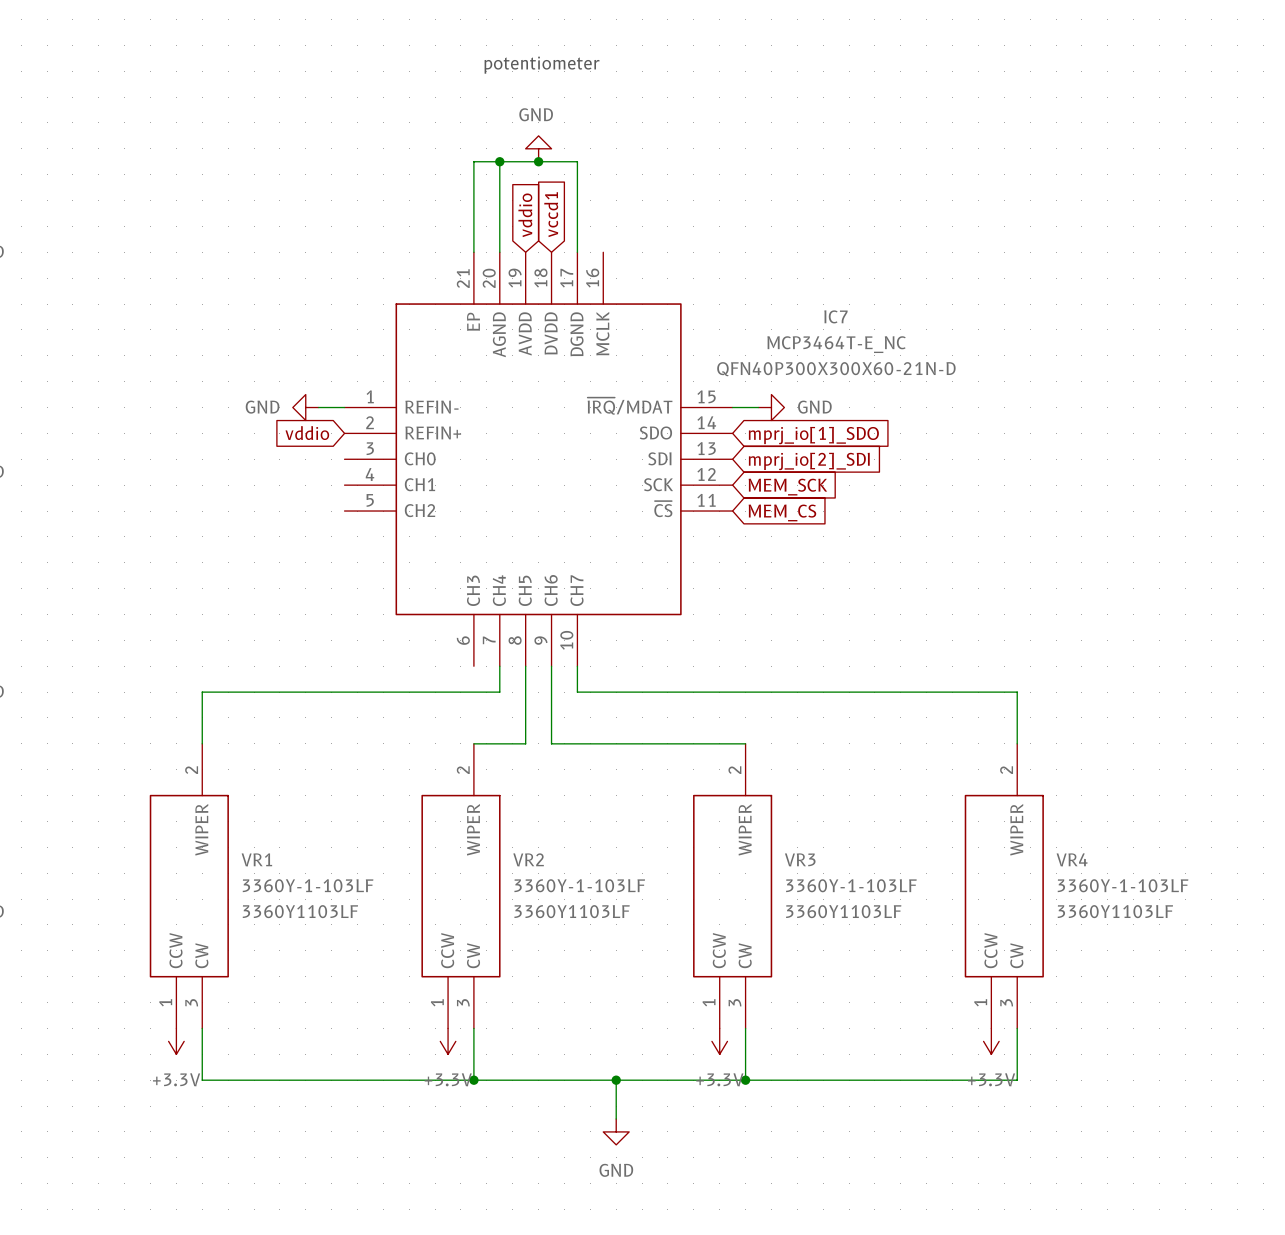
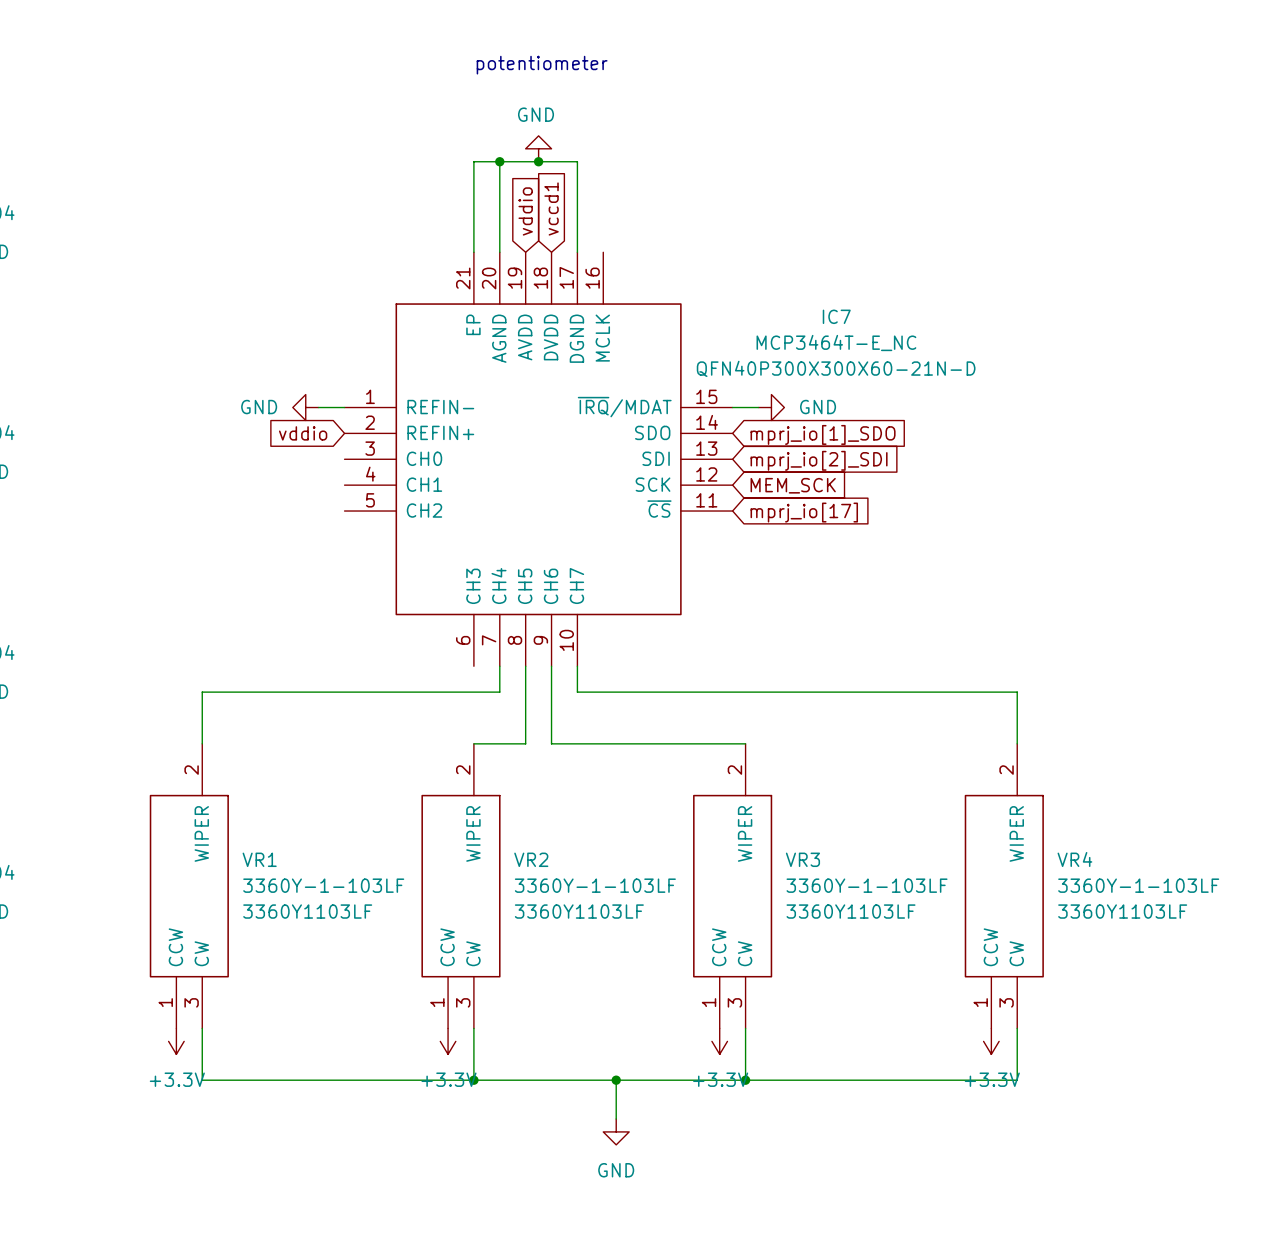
global label: MEM_CS (782, 512) -> mprj_io[17] (804, 512)

